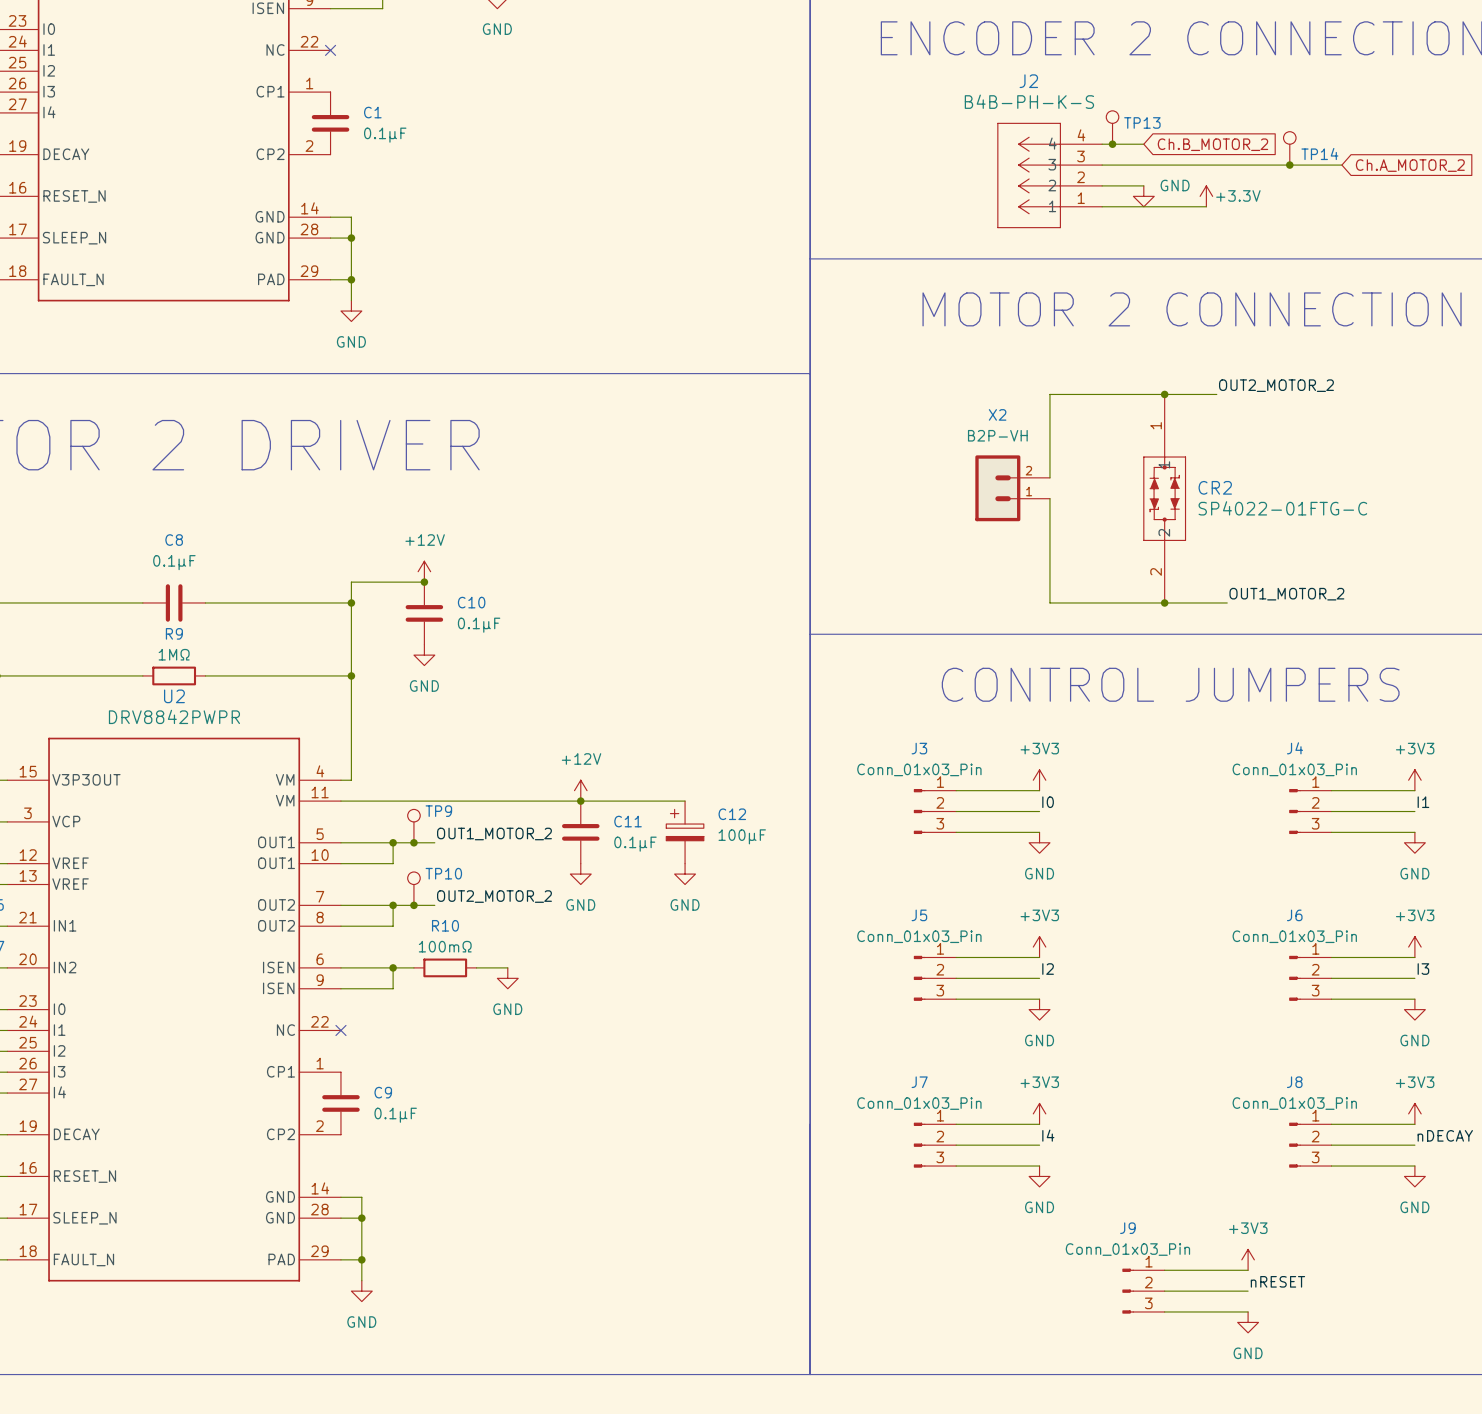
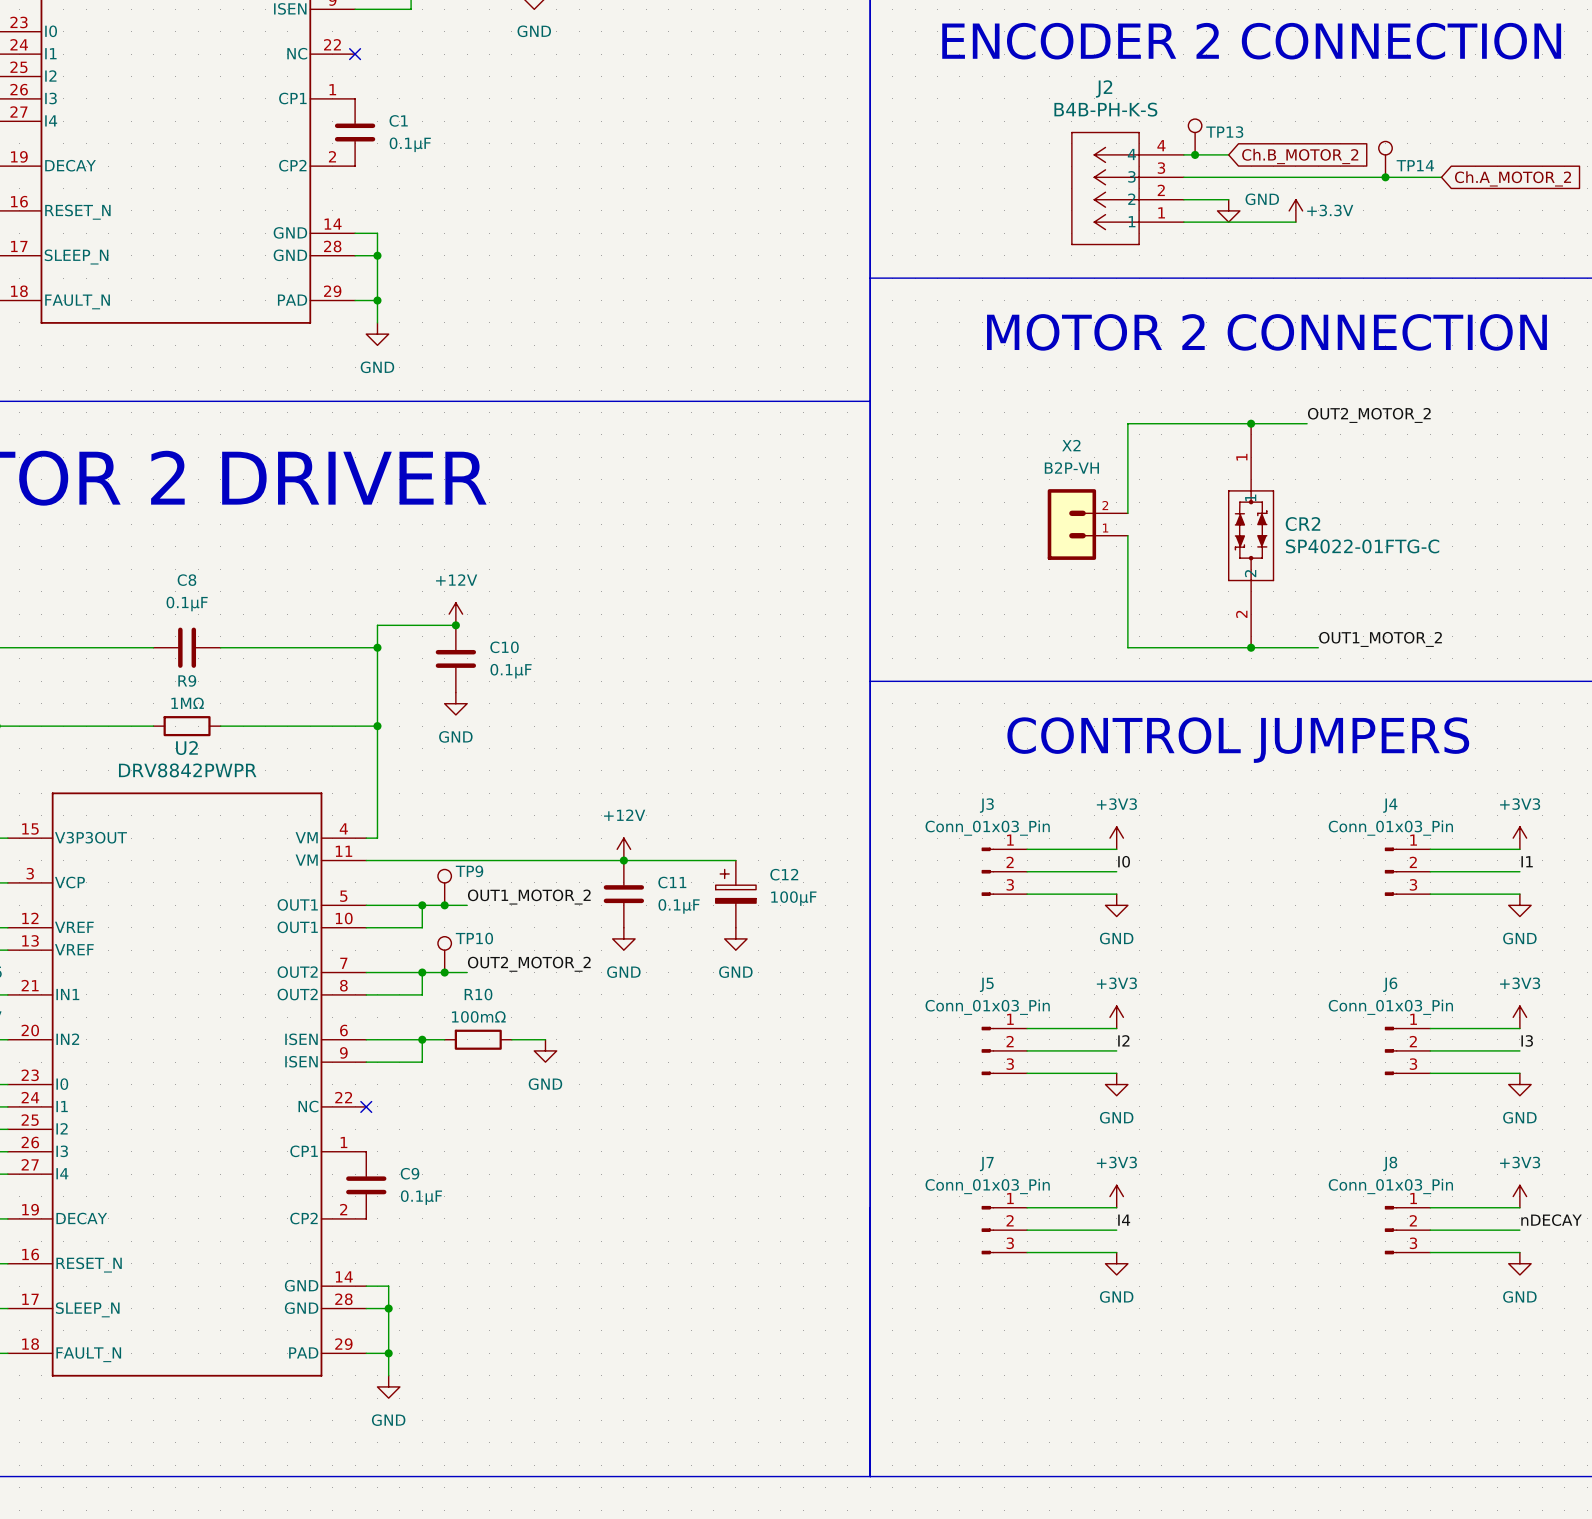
power symbol: +3V3 (1248, 1259) -> none
wire: (1164, 1270) (1248, 1270) -> none
label: nRESET (1277, 1281) -> none
J9: Conn_01x03_Pin (1143, 1291) -> none
wire: (1164, 1291) (1248, 1291) -> none
wire: (1164, 1311) (1248, 1311) -> none
power symbol: GND (1248, 1322) -> none

